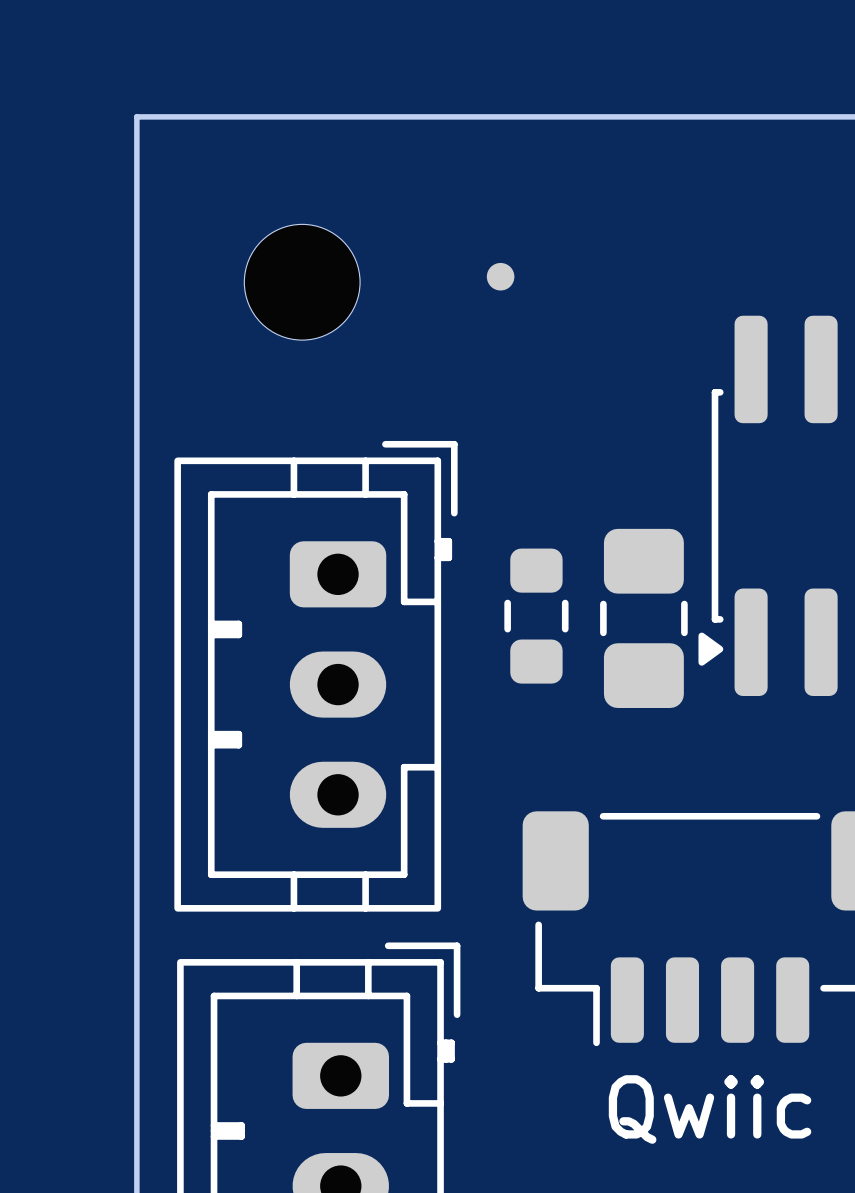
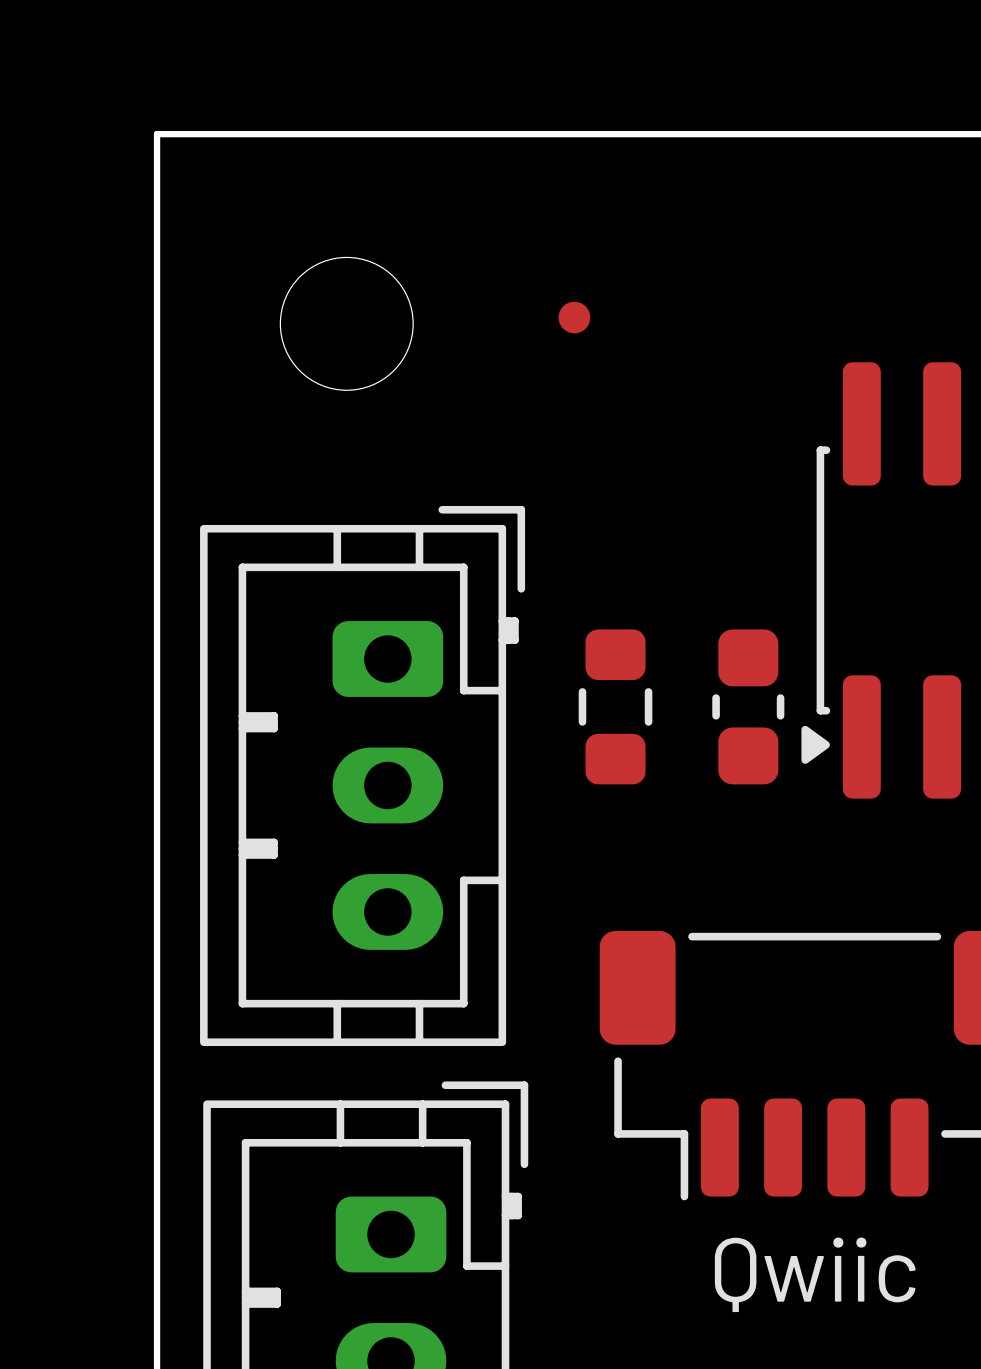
part footprint: [600, 528, 688, 708] -> [712, 629, 785, 785]

